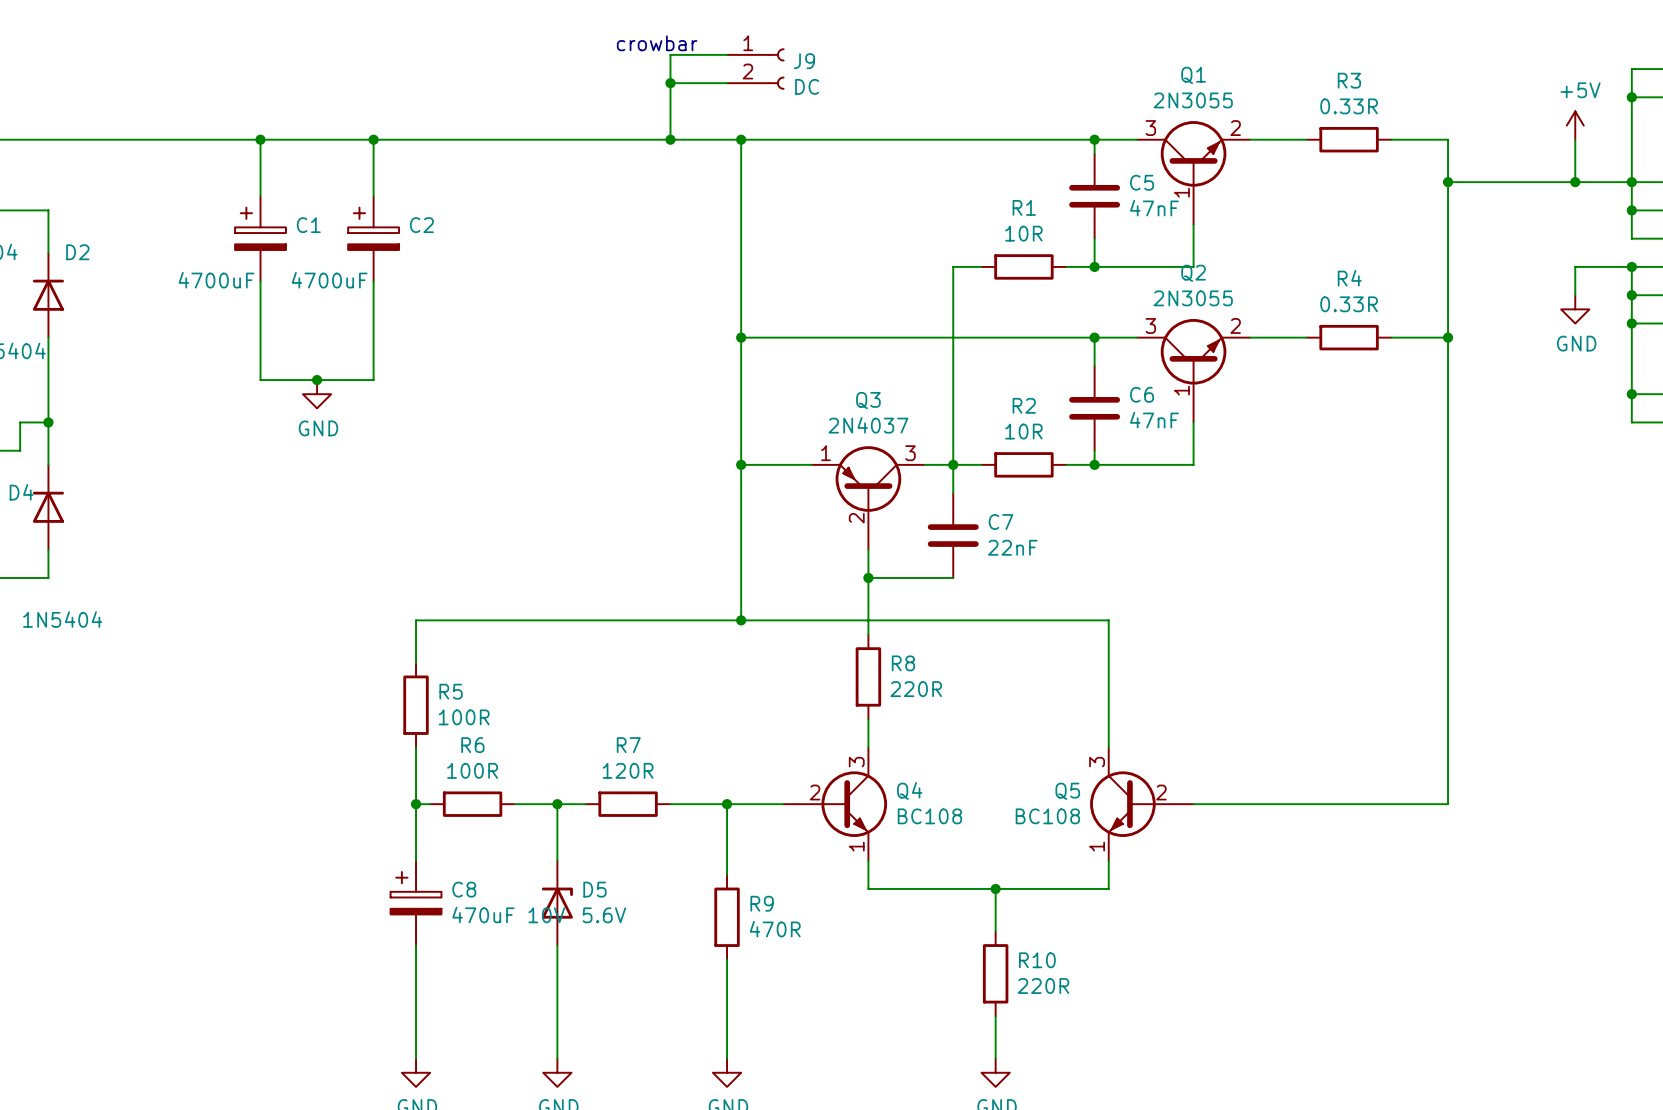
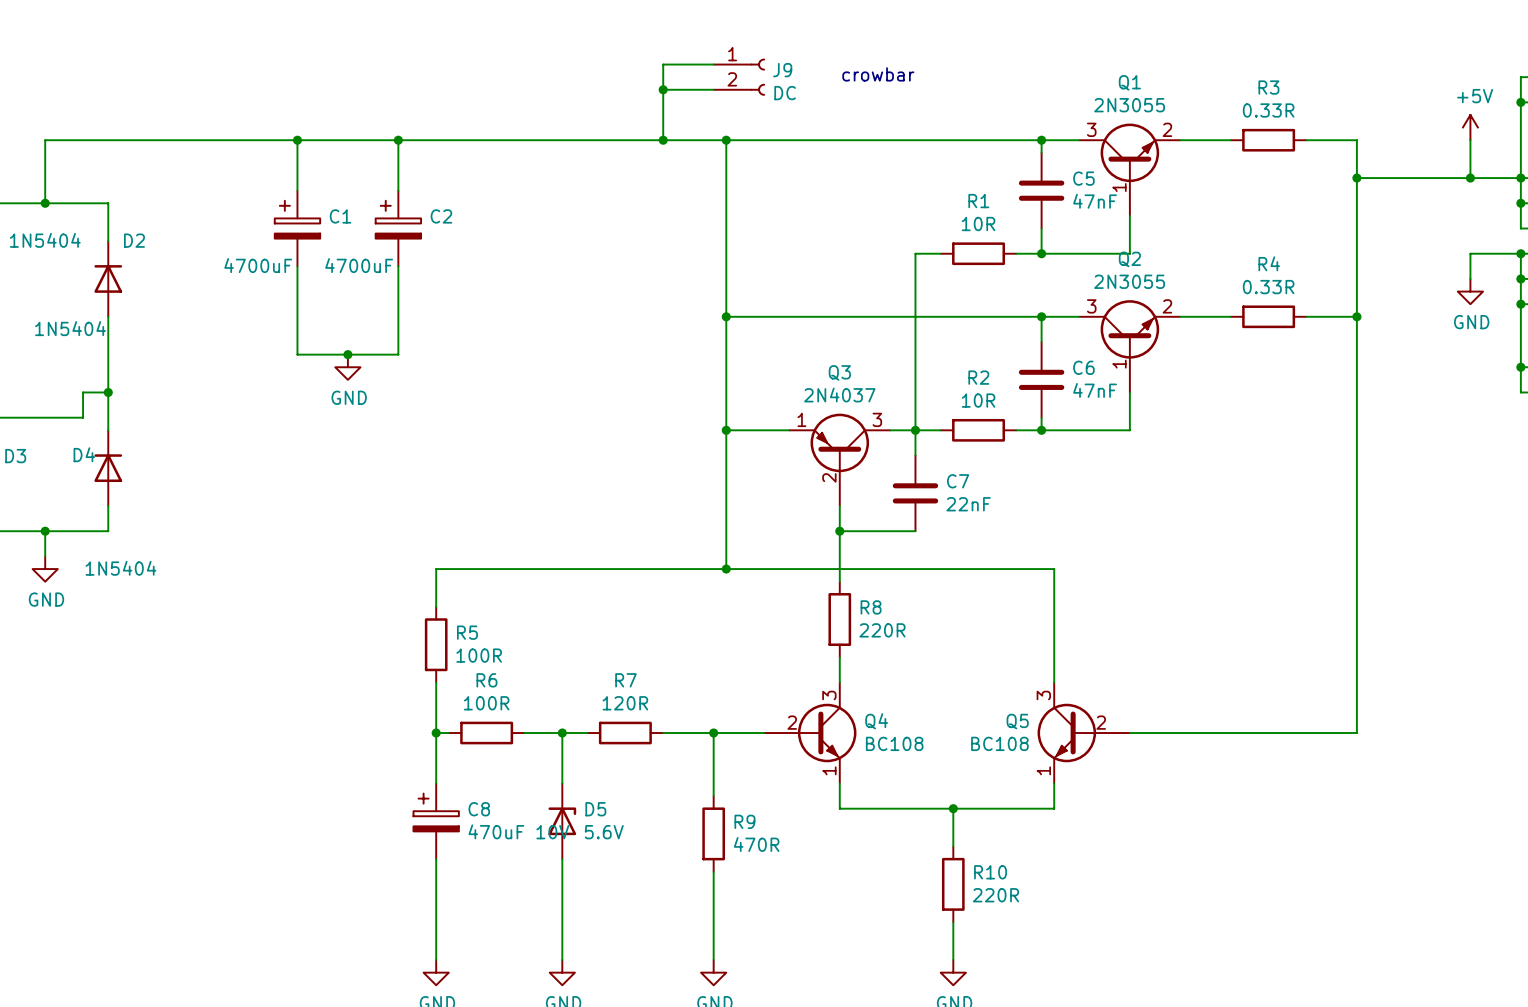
text position: crowbar (657, 43) -> crowbar (878, 74)

